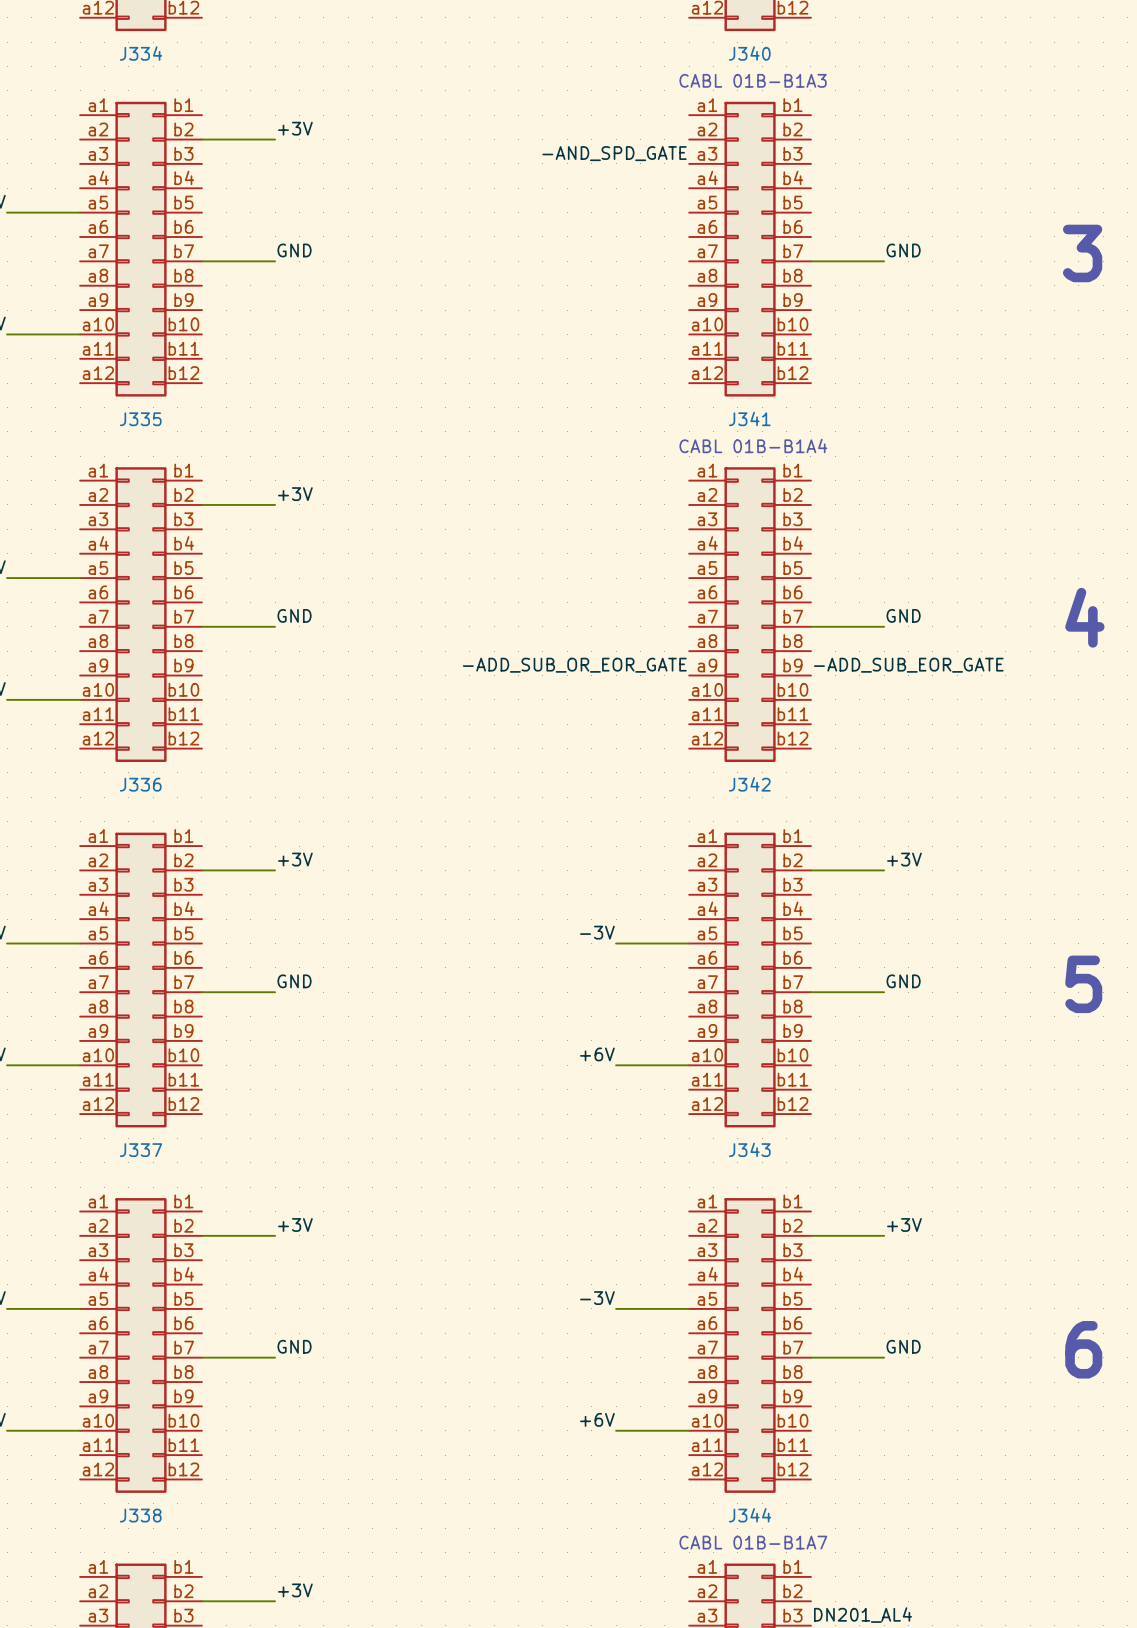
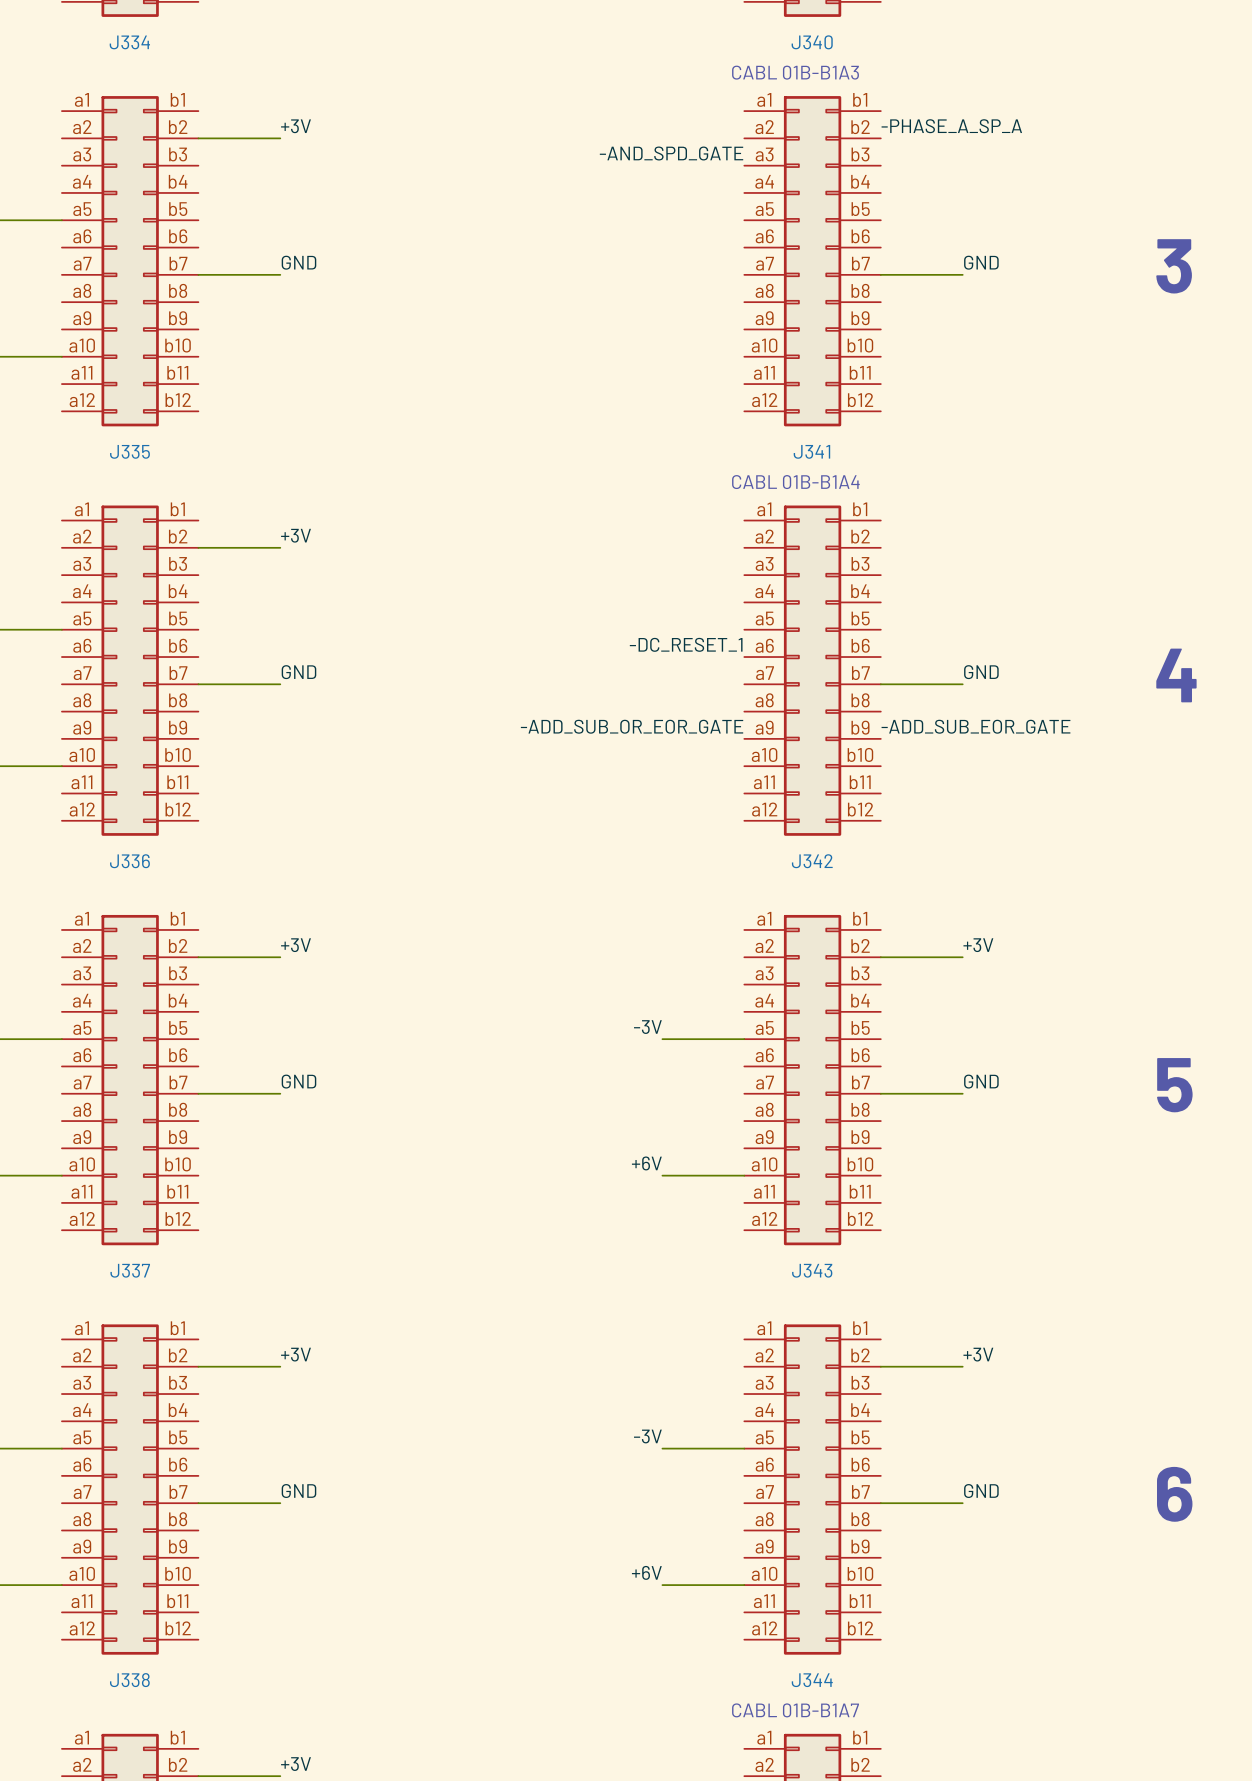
label: none -> -PHASE_A_SP_A (951, 126)
label: none -> -DC_RESET_1 (686, 644)

